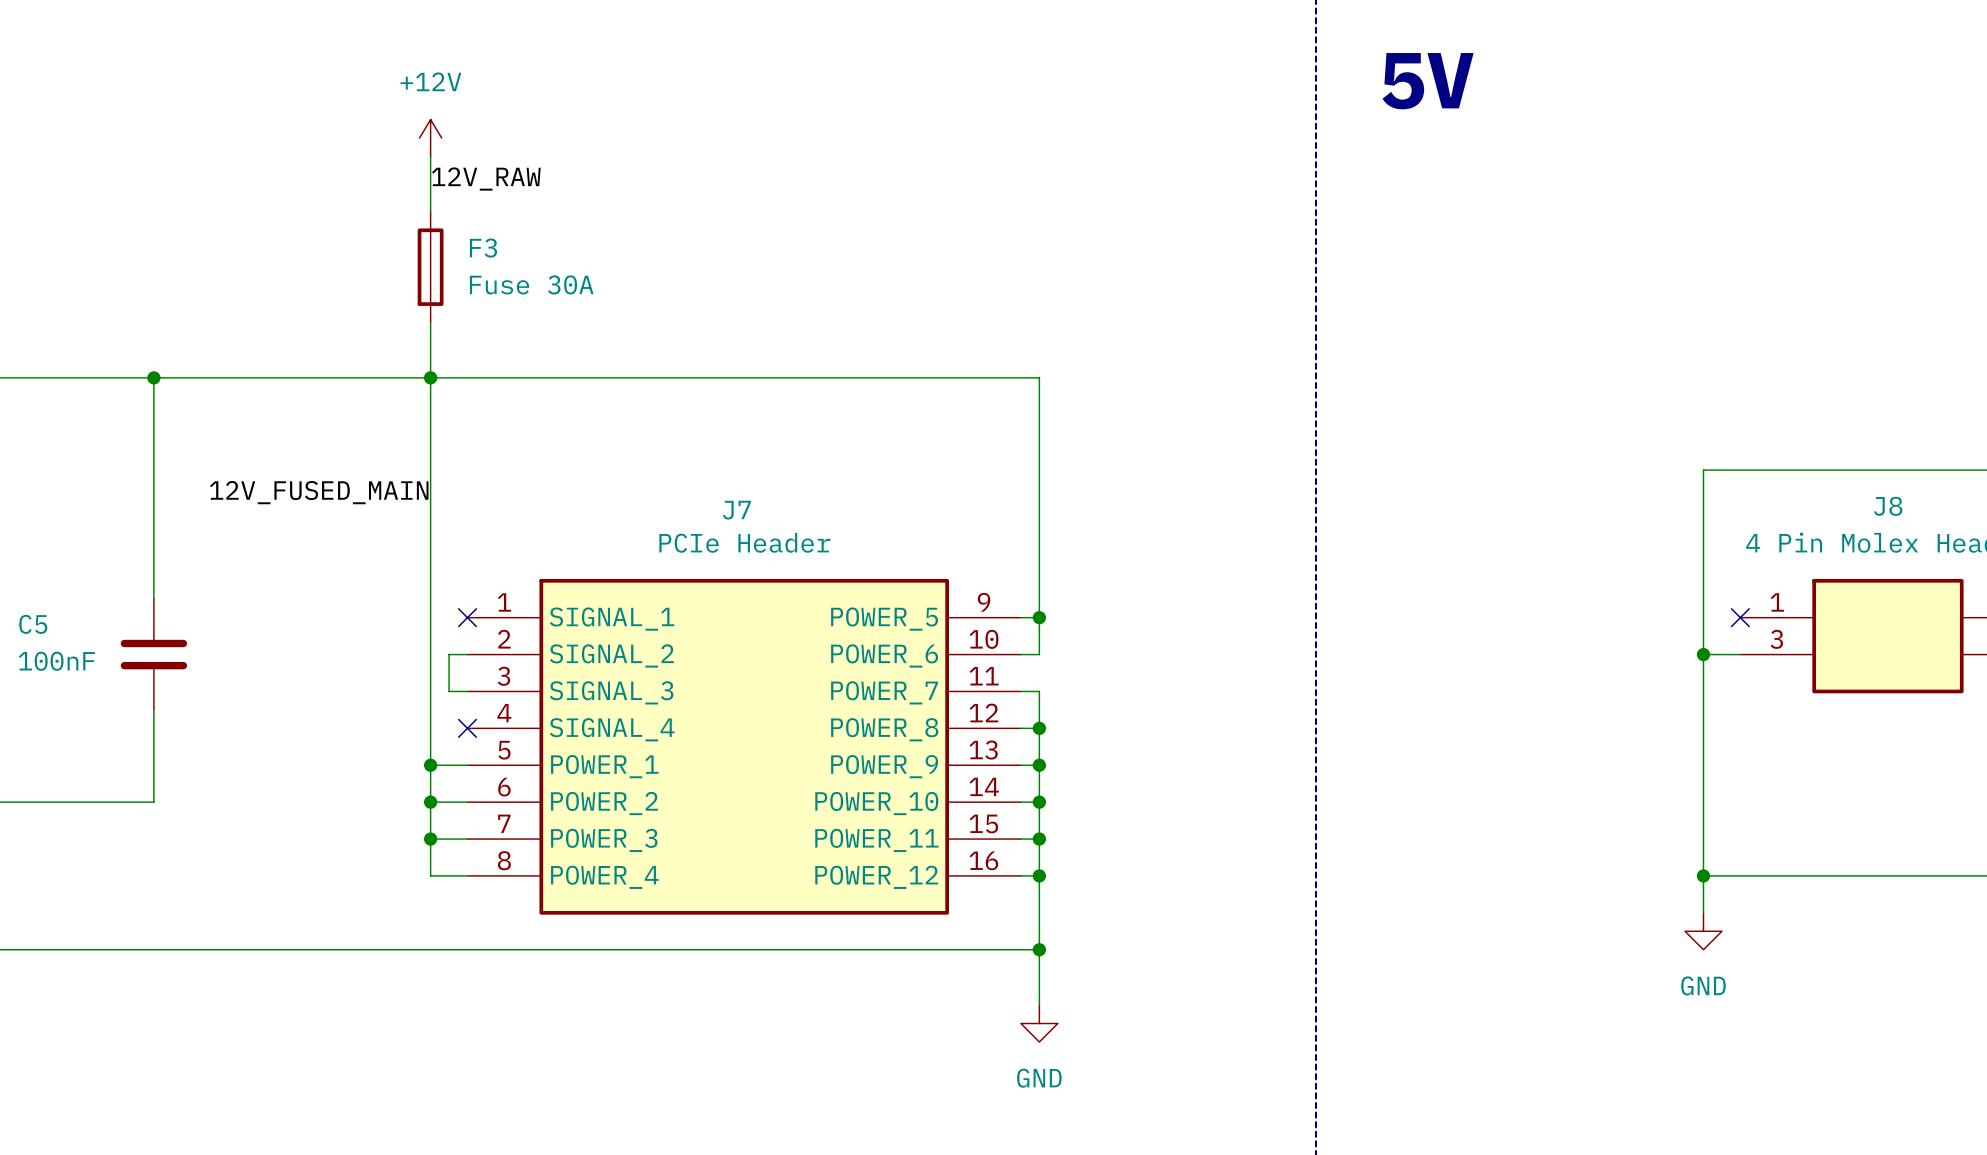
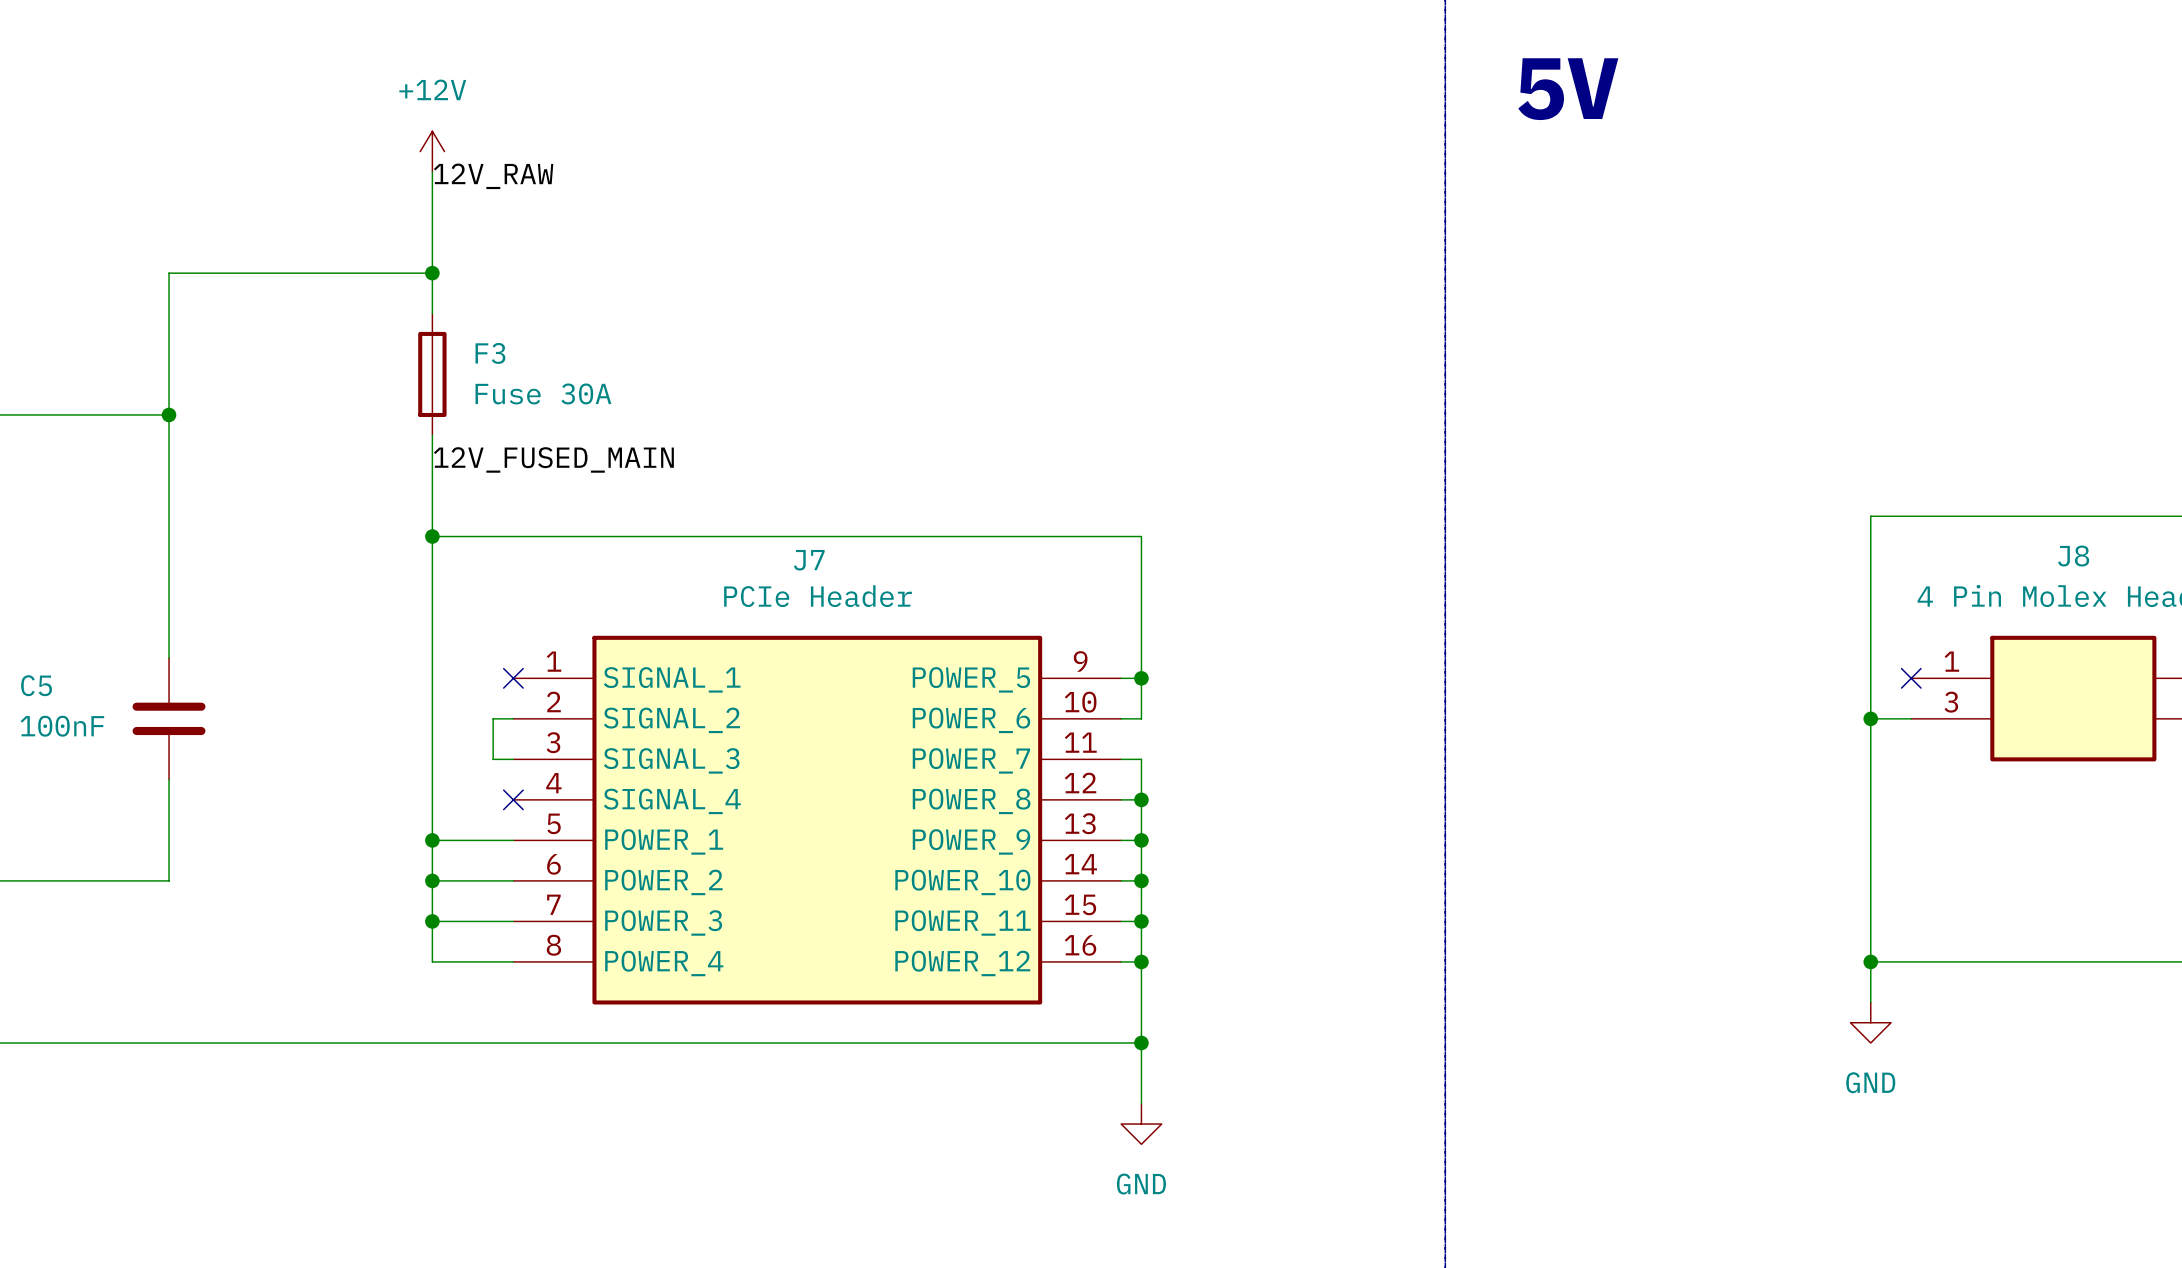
power symbol position: +12V (430, 138) -> +12V (432, 151)
wire: none -> (432, 171) (432, 313)
wire: (430, 156) (430, 211) -> none
label position: 12V_RAW (486, 179) -> 12V_RAW (493, 176)
wire: none -> (432, 273) (169, 273) (169, 414)
junction: none -> (432, 273)
F3 position: (430, 267) -> (432, 374)
wire: (430, 322) (430, 875) -> (432, 435) (432, 961) (472, 961)
wire: (153, 377) (1039, 377) (1039, 488) -> (432, 536) (1141, 536)
junction: (430, 377) -> none
junction: none -> (432, 536)
label position: 12V_FUSED_MAIN (319, 492) -> 12V_FUSED_MAIN (553, 459)
wire: none -> (432, 840) (472, 840)
junction: none -> (432, 840)
junction: (430, 765) -> none
wire: none -> (432, 880) (472, 880)
junction: none -> (432, 880)
junction: (430, 802) -> none
wire: none -> (432, 921) (472, 921)
junction: none -> (432, 921)
junction: (430, 839) -> none

